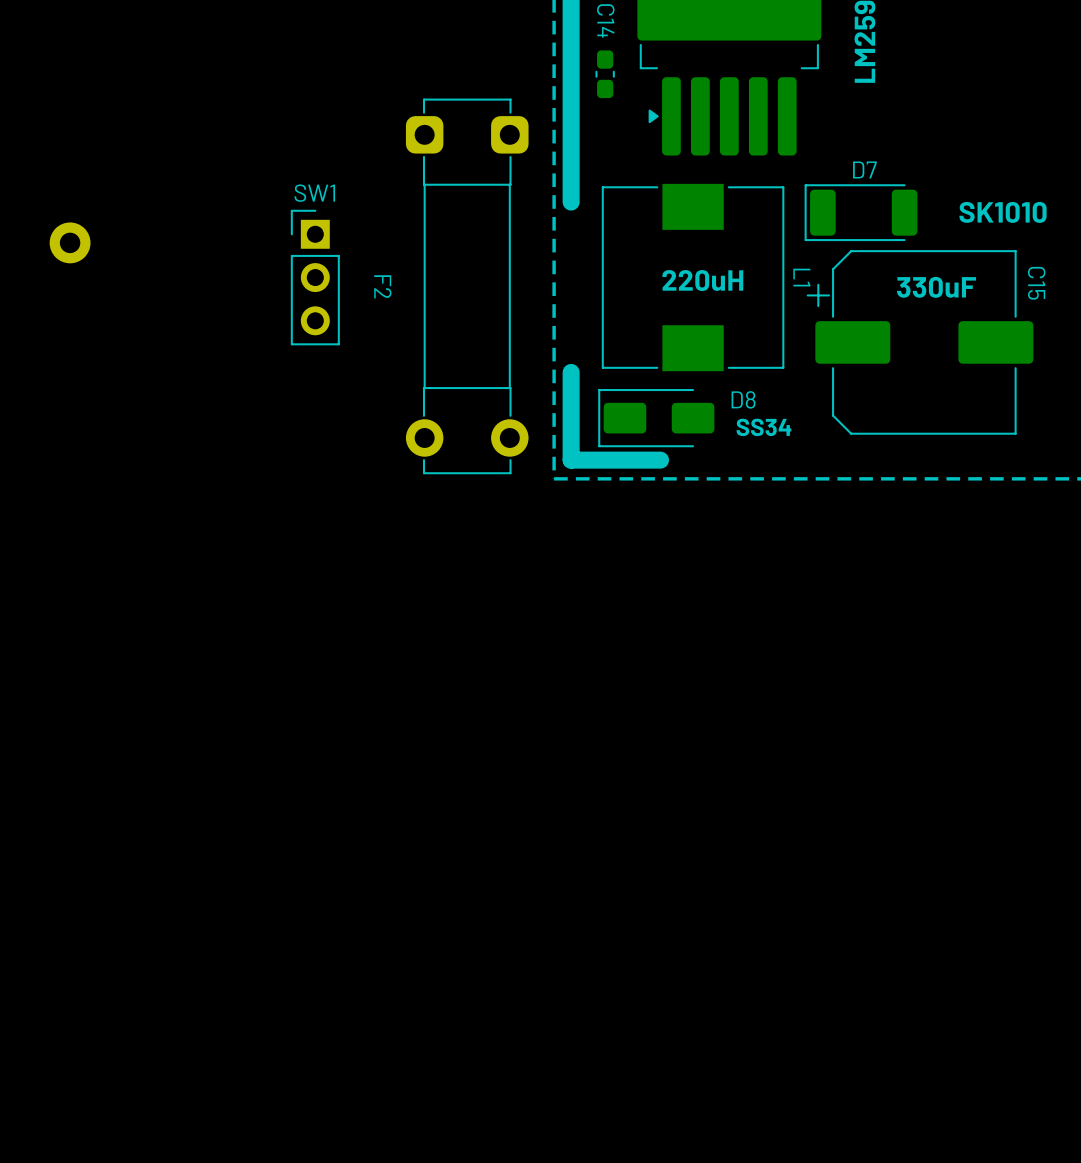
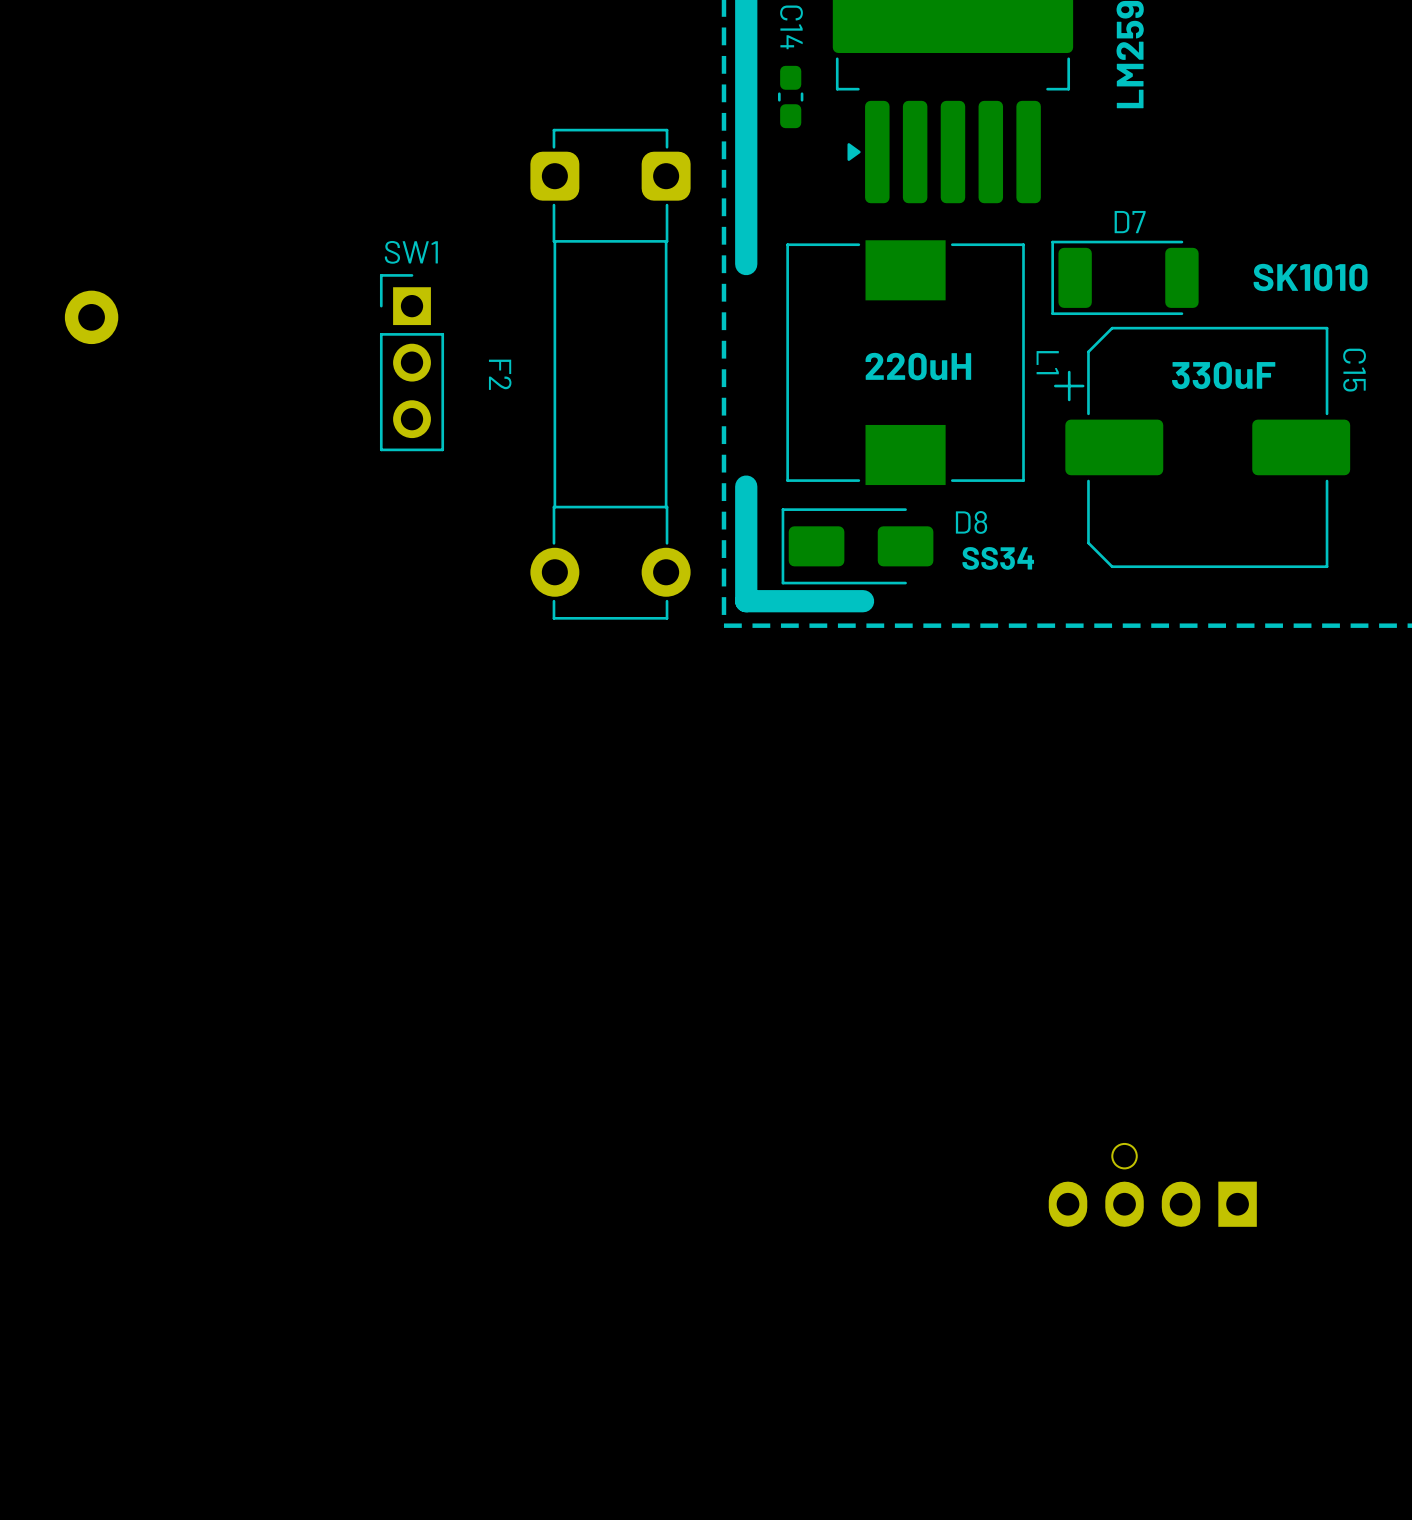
part: none -> (1152, 1185)

